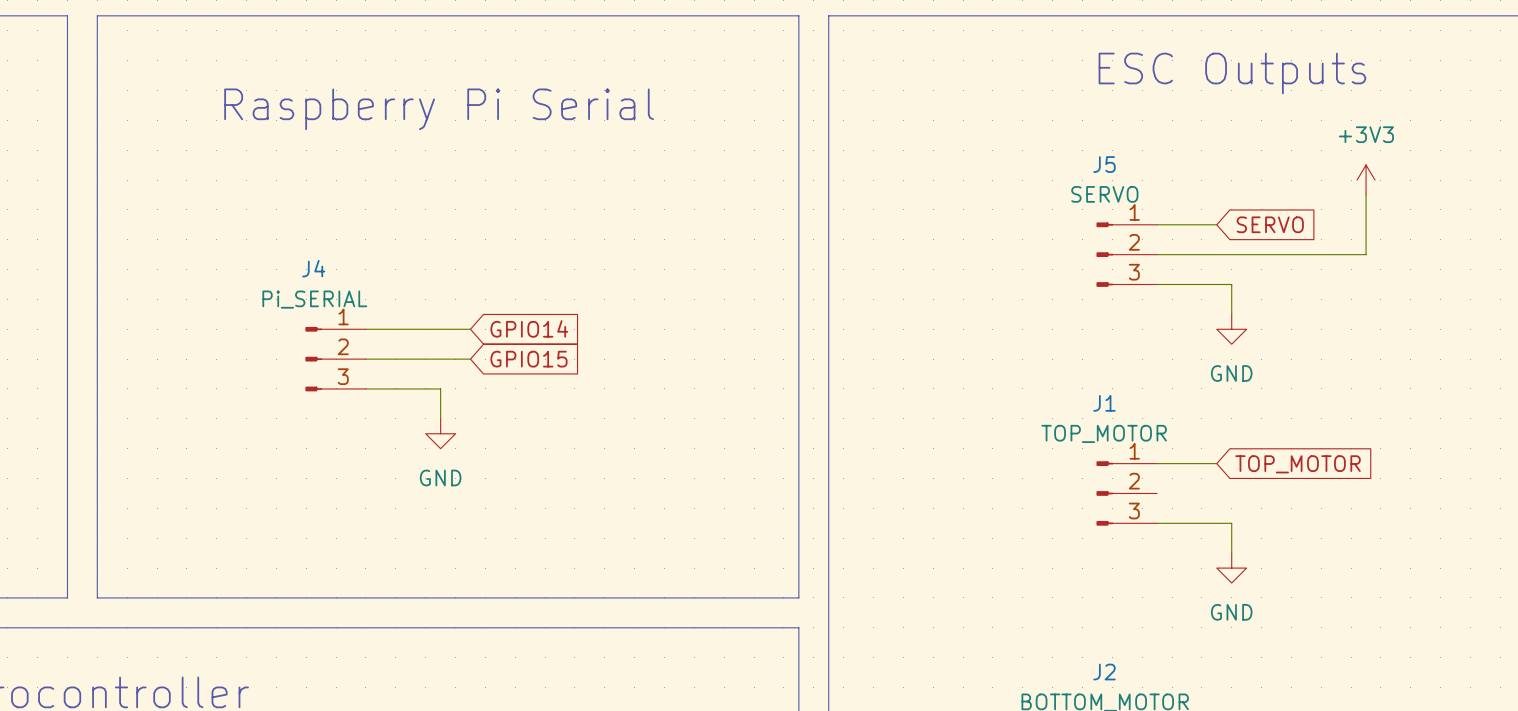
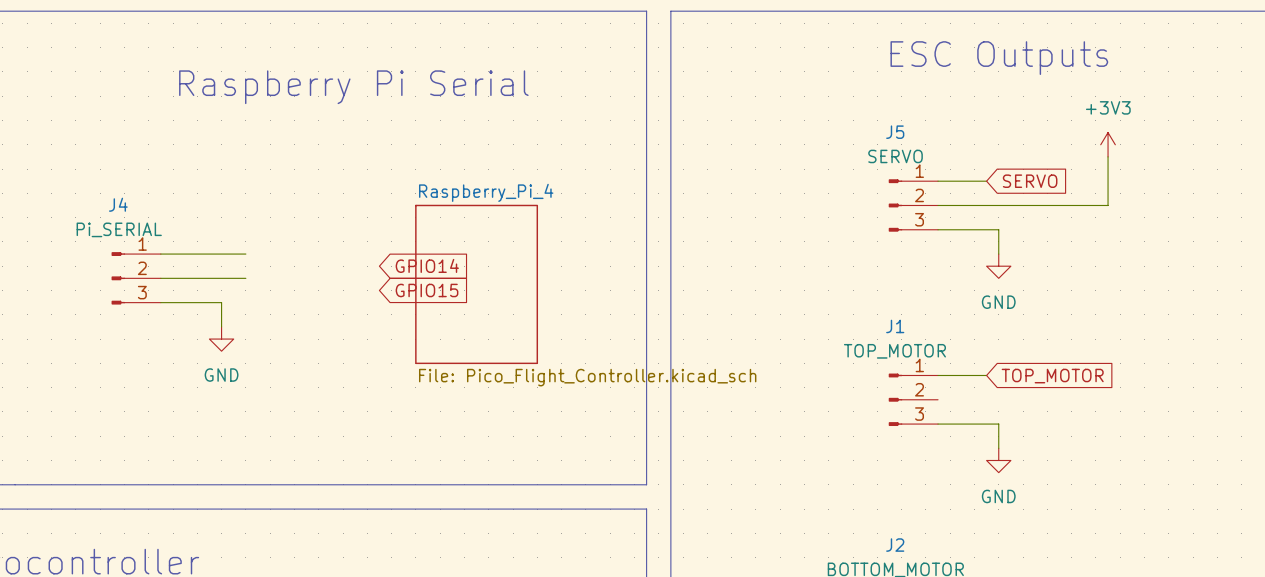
line: (67, 15) (67, 597) -> (51, 11) (75, 11)
line: (97, 15) (97, 597) -> (51, 484) (75, 484)
wire: (365, 329) (470, 329) -> (160, 254) (245, 254)
sheet Raspberry_Pi_4: none -> File: Pico_Flight_Controller.kicad_sch (476, 284)
J4 position: (335, 359) -> (136, 278)
wire: (365, 359) (470, 359) -> (160, 278) (245, 278)
wire: (365, 388) (440, 388) (440, 418) -> (160, 302) (221, 302) (221, 326)
power symbol position: GND (440, 433) -> GND (221, 339)

